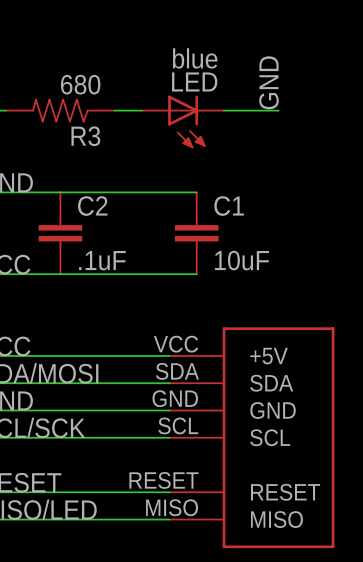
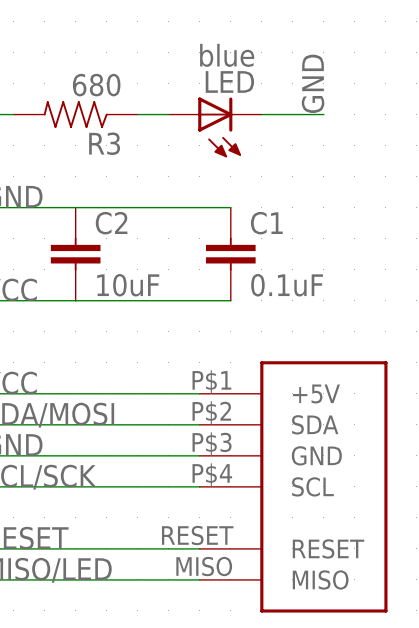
C2 value: .1uF (102, 260) -> 10uF (128, 285)
C1 value: 10uF (242, 260) -> 0.1uF (287, 285)
part pin number: VCC (176, 344) -> P$1 (211, 381)
part pin number: SDA (177, 371) -> P$2 (211, 412)
part pin number: GND (175, 398) -> P$3 (212, 443)
part pin number: SCL (178, 425) -> P$4 (212, 474)

